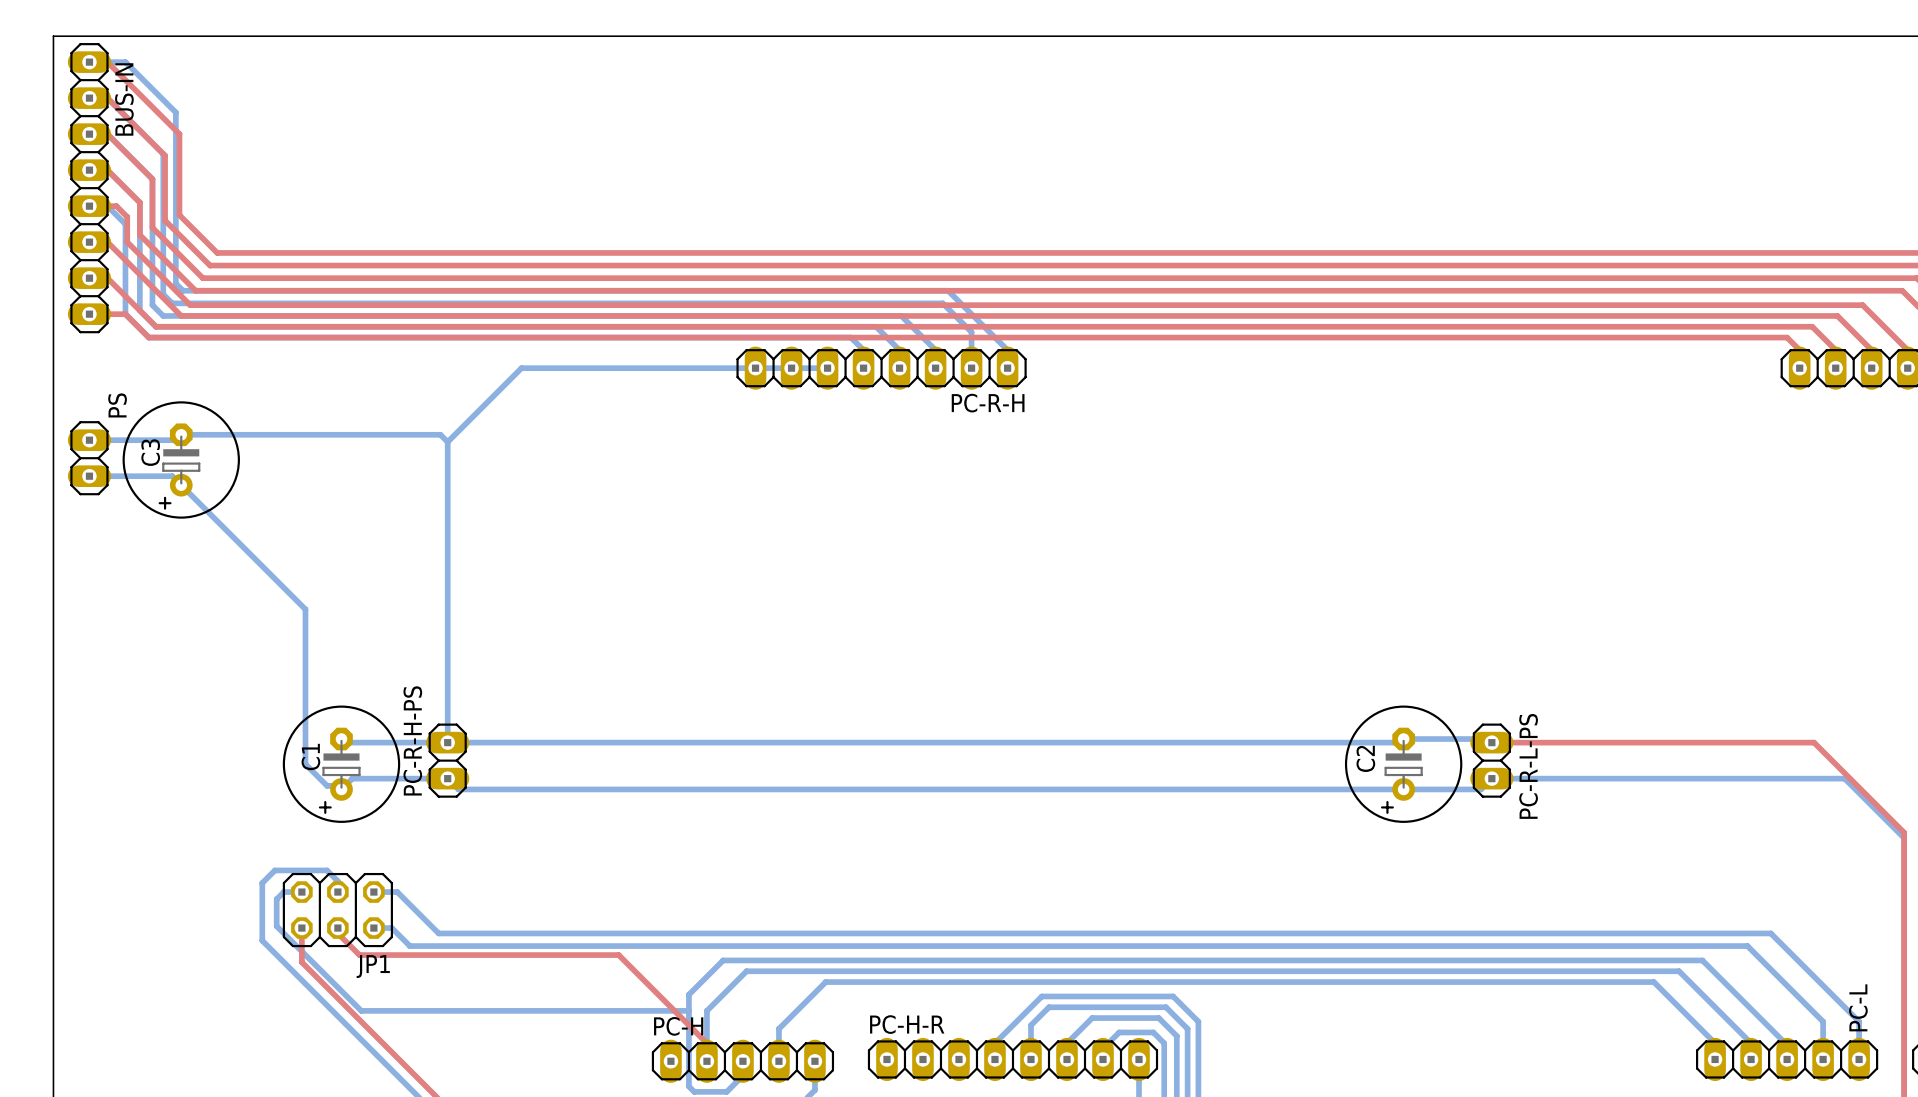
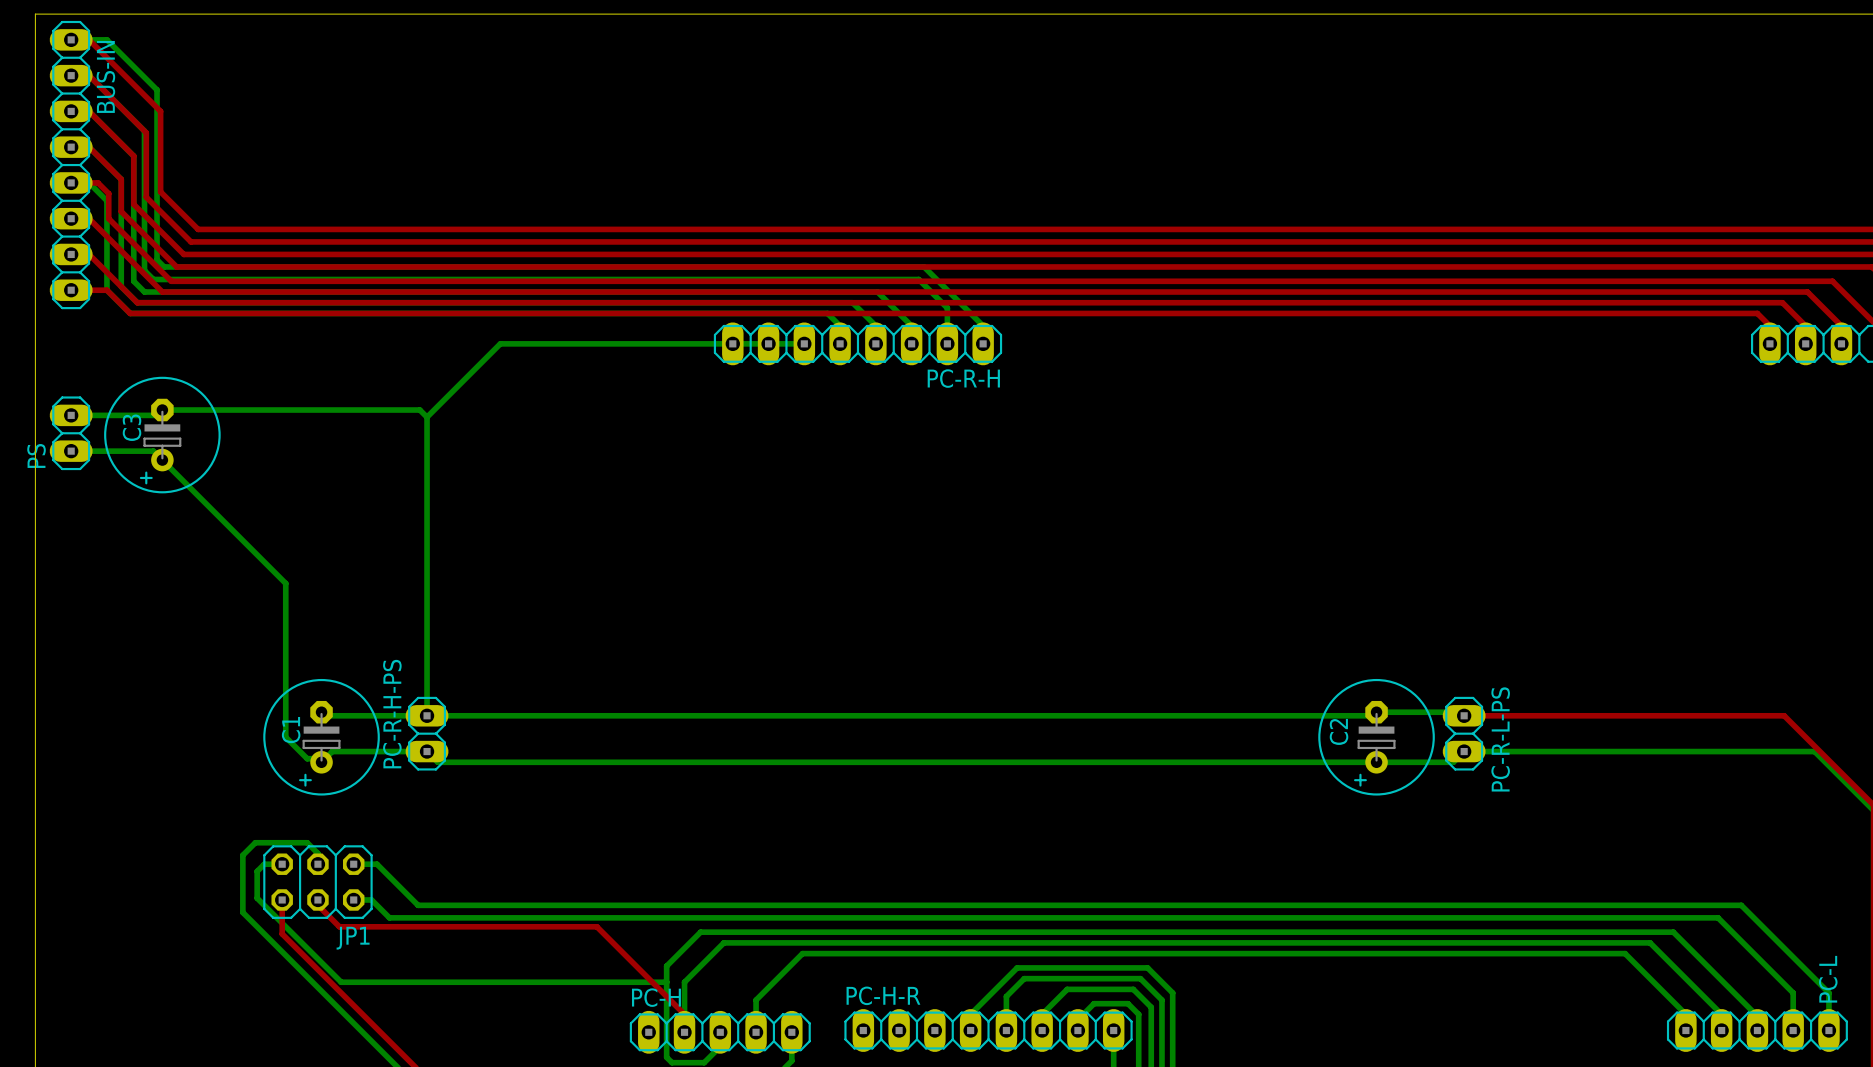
PS name position: PS (117, 405) -> PS (36, 455)

